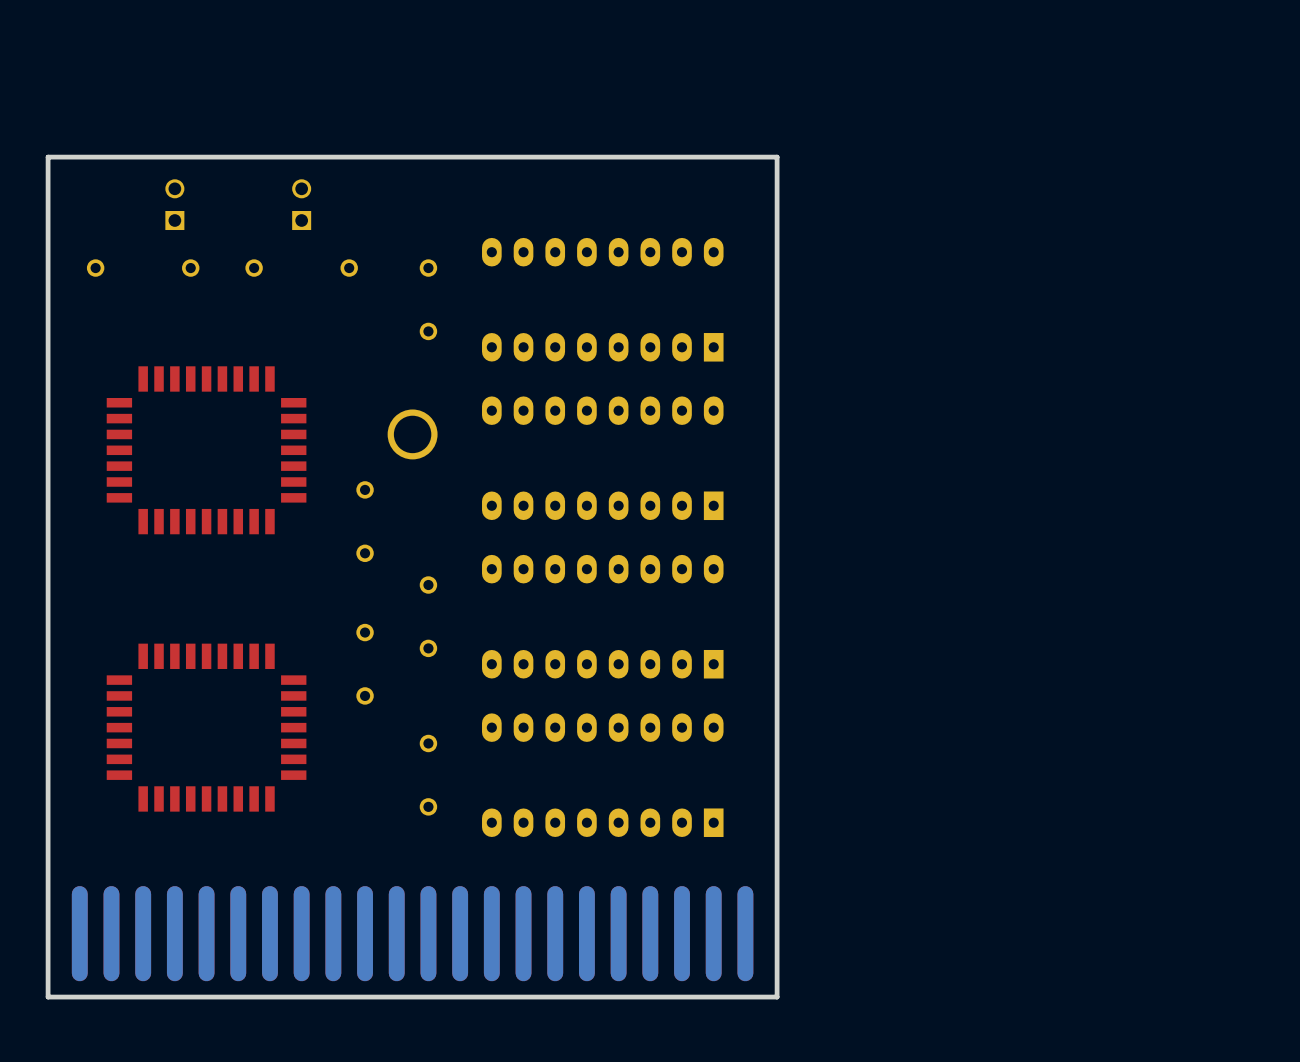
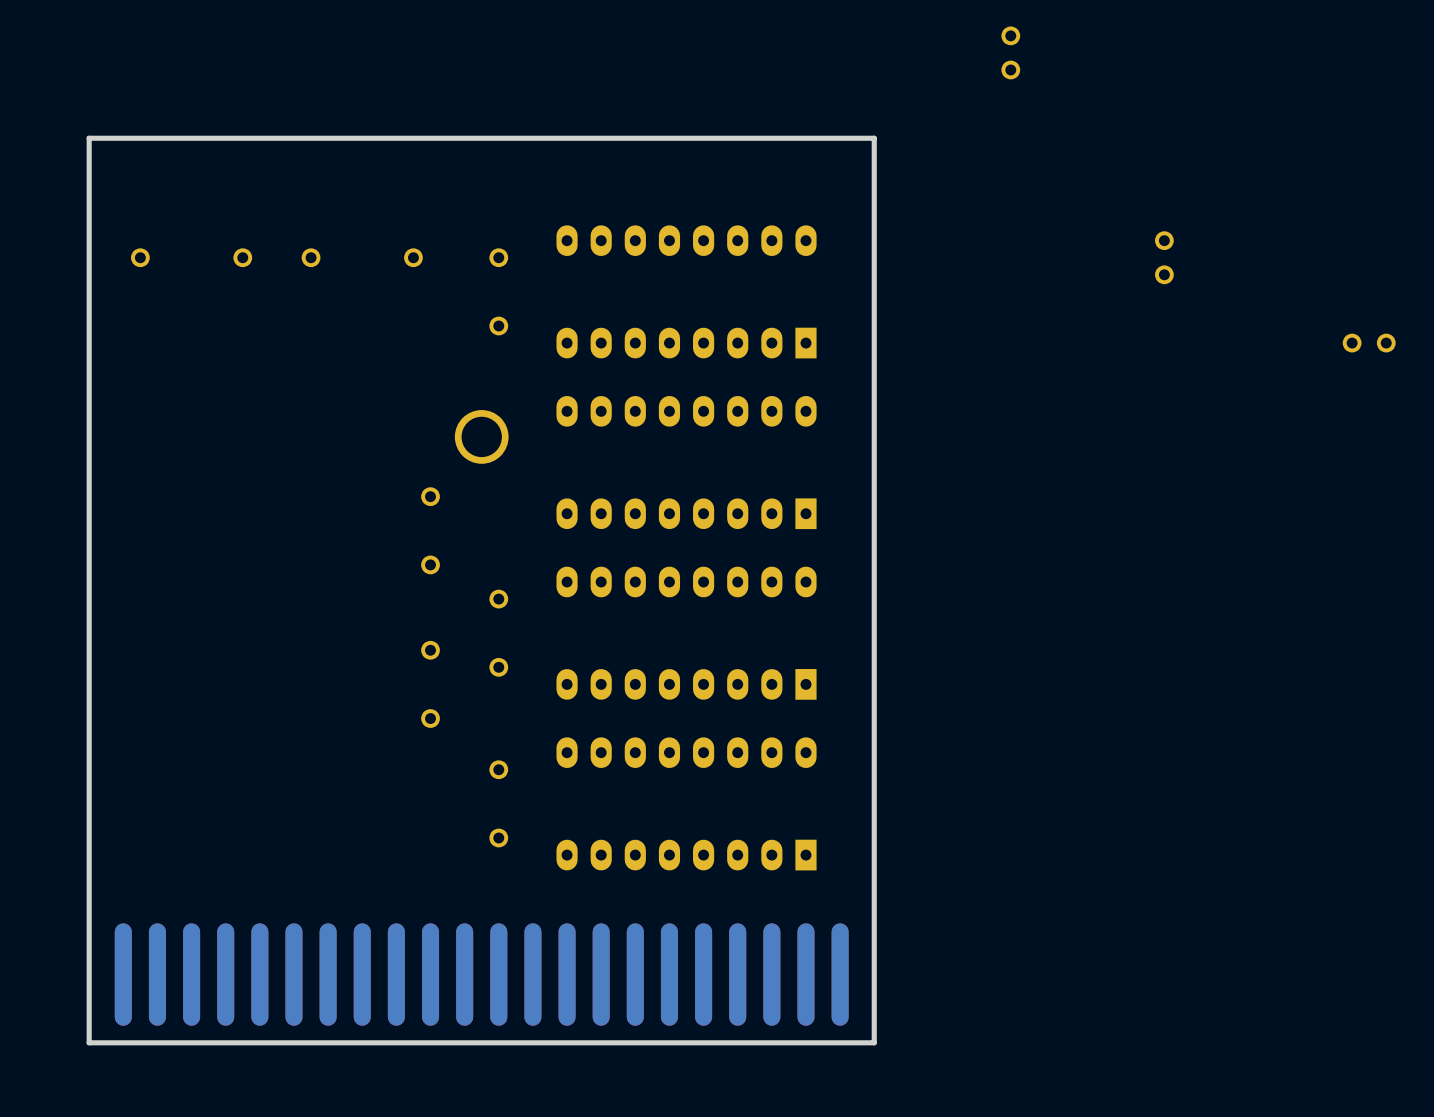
part: none -> (1010, 52)
part: (174, 204) -> none
part: (301, 204) -> none
part: none -> (1164, 257)
part: none -> (1369, 343)
part: (206, 450) -> none
part: (206, 727) -> none

